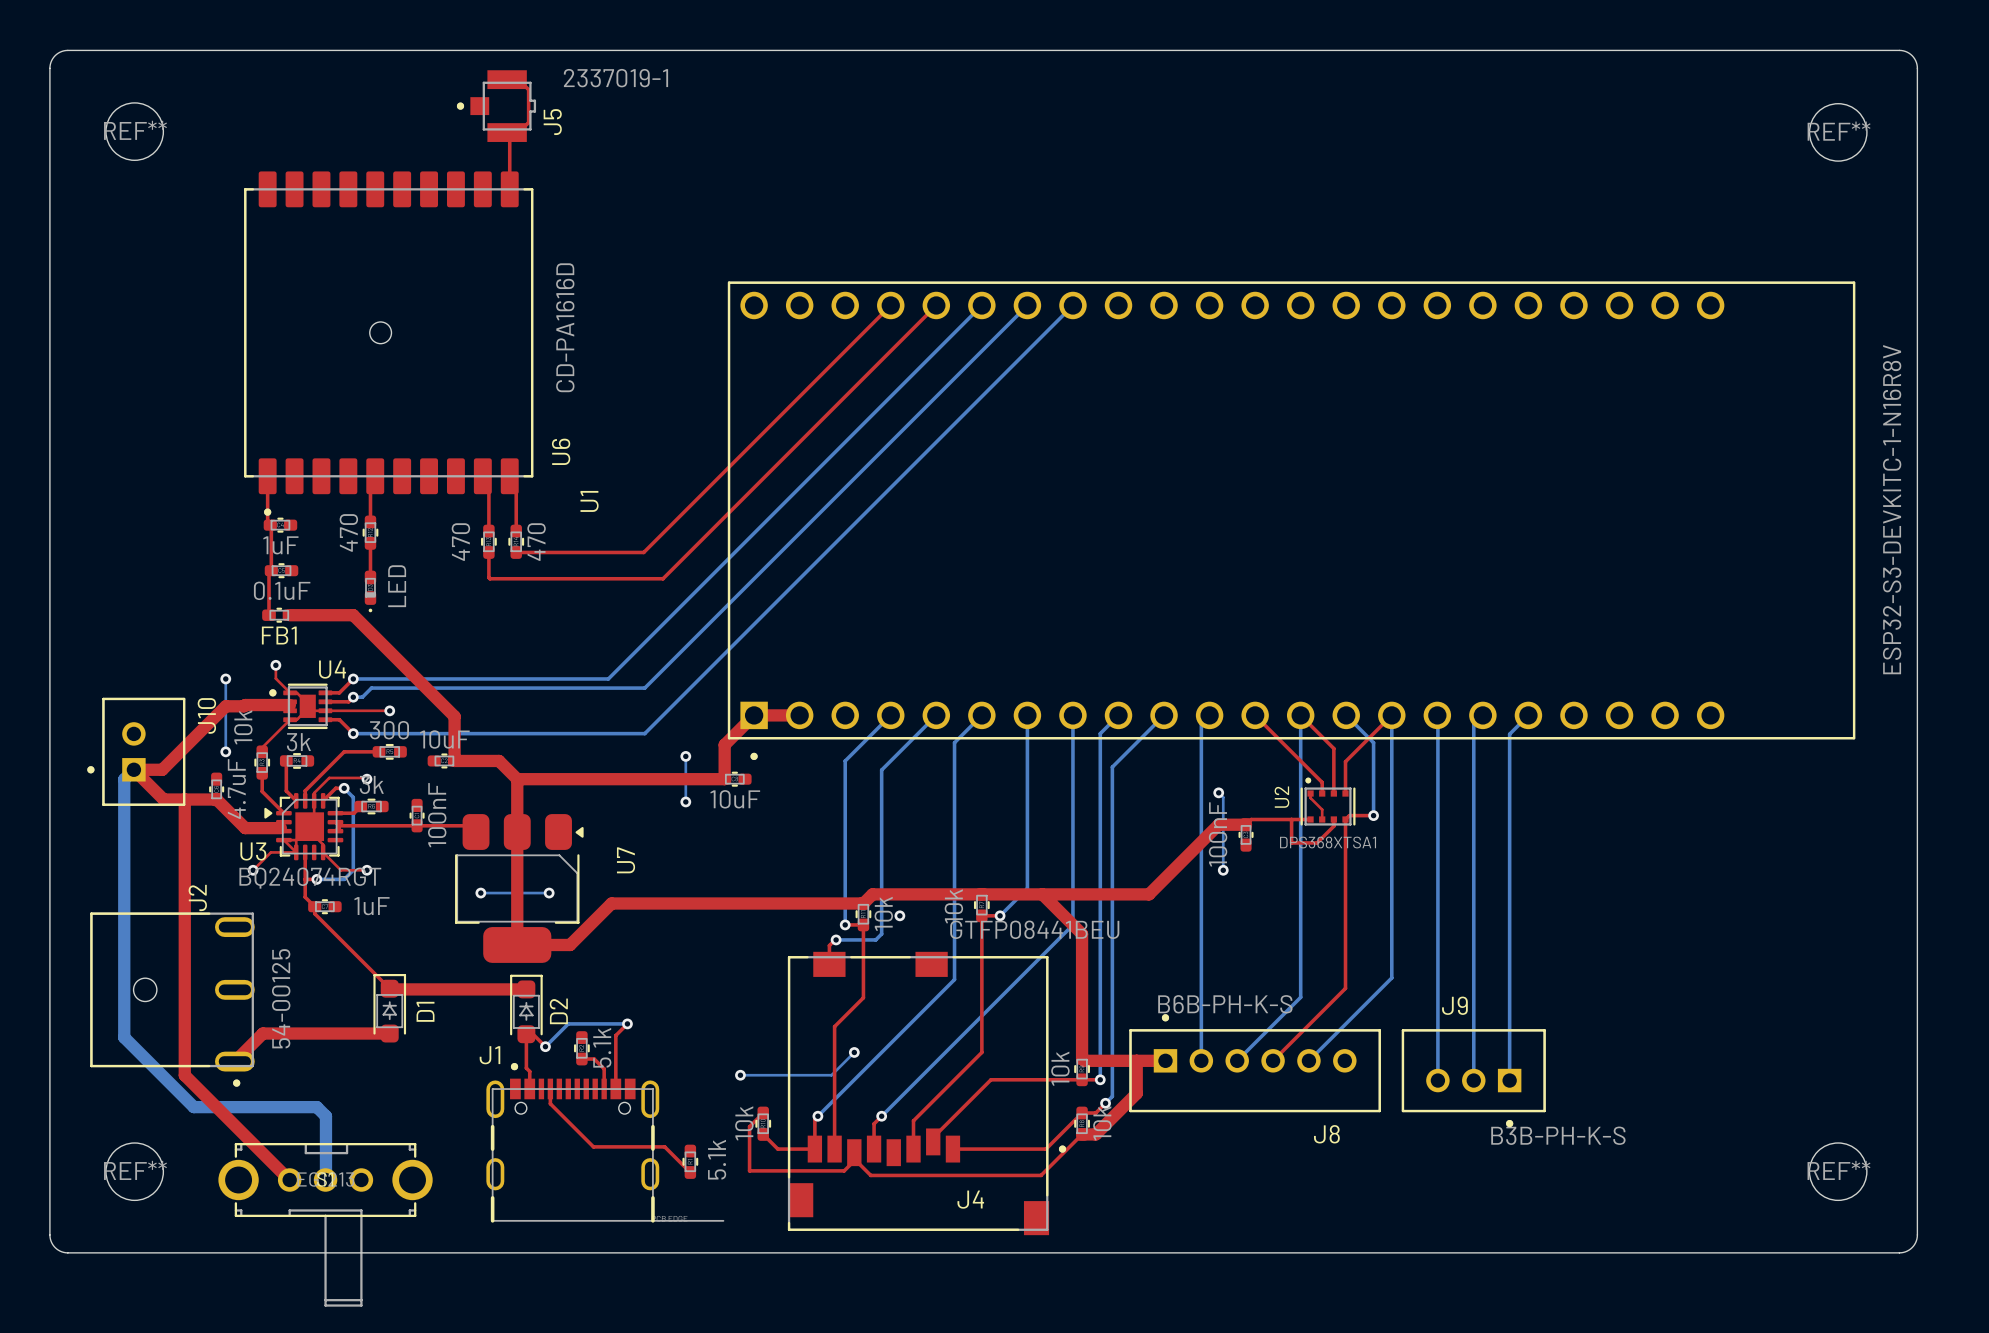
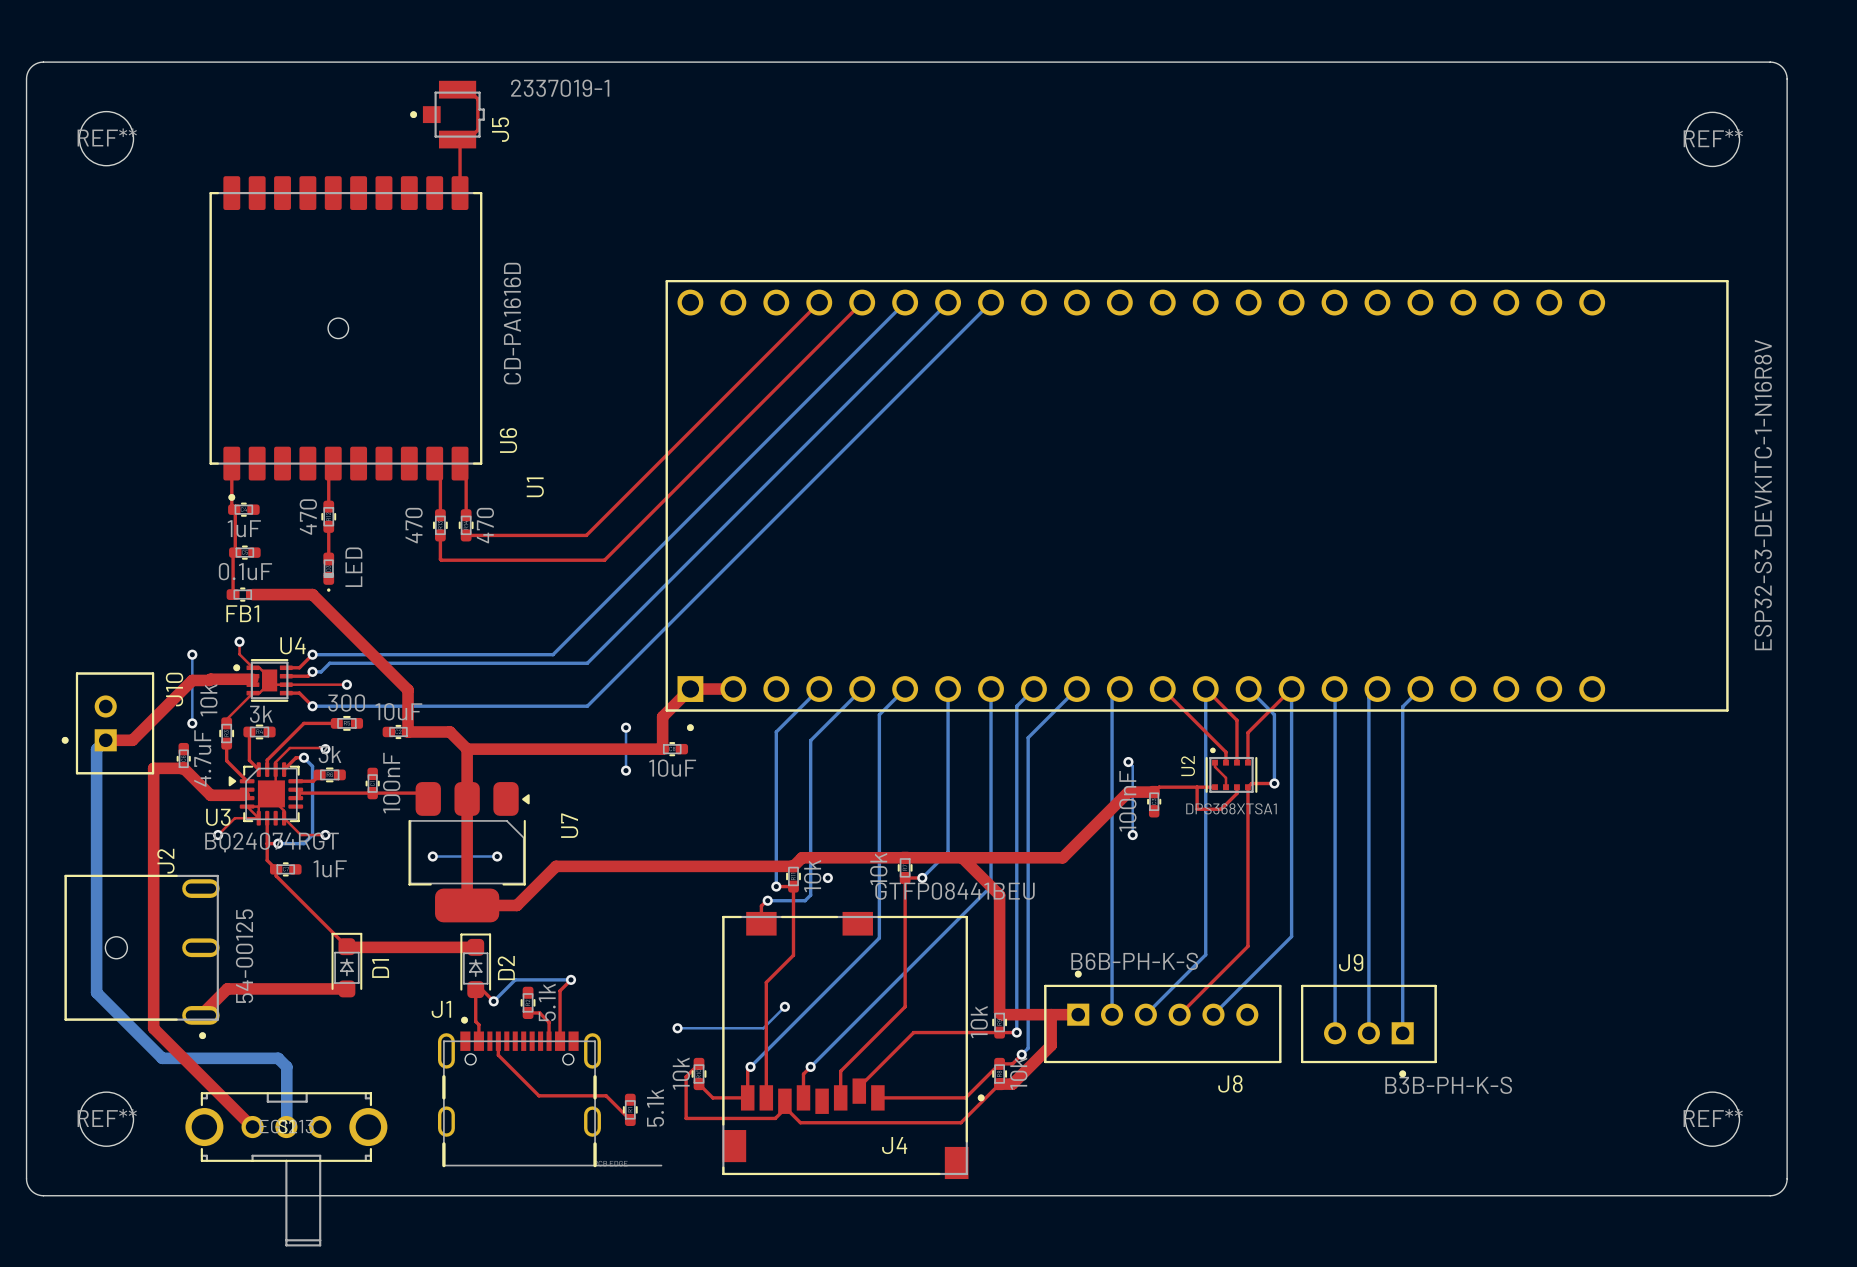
top track: (133, 769) (163, 799) (184, 799) -> none

